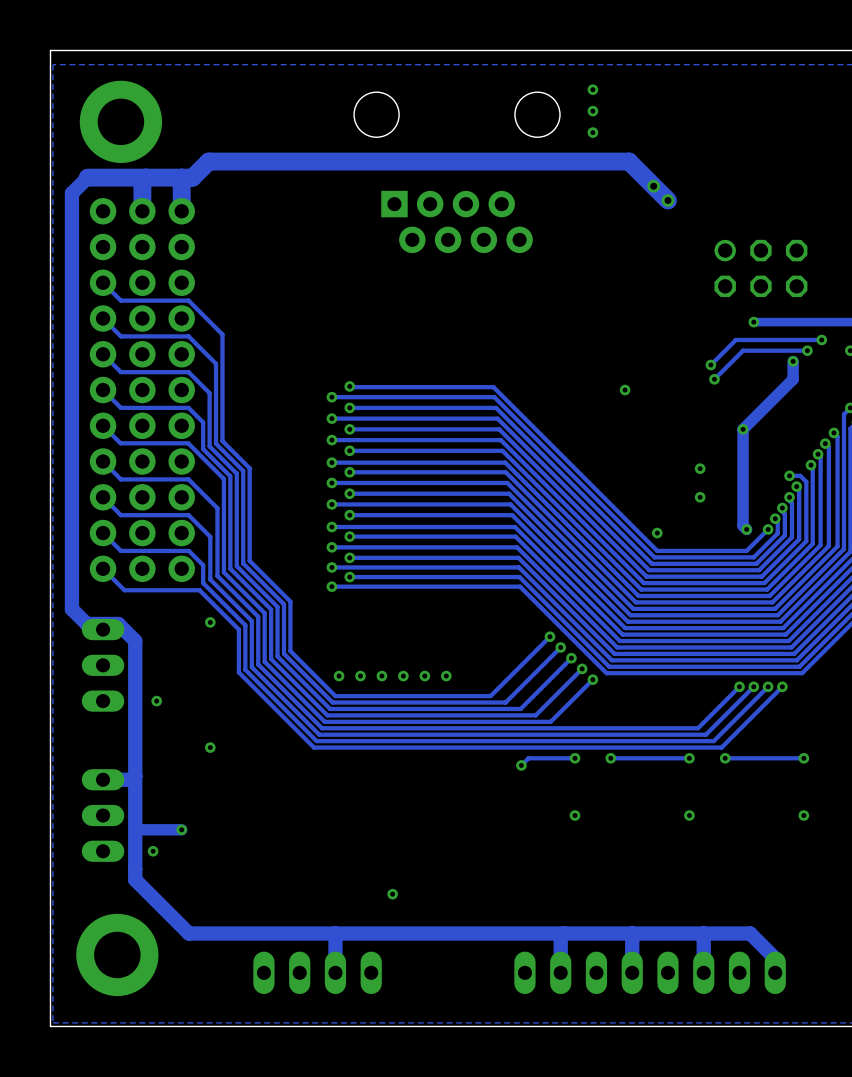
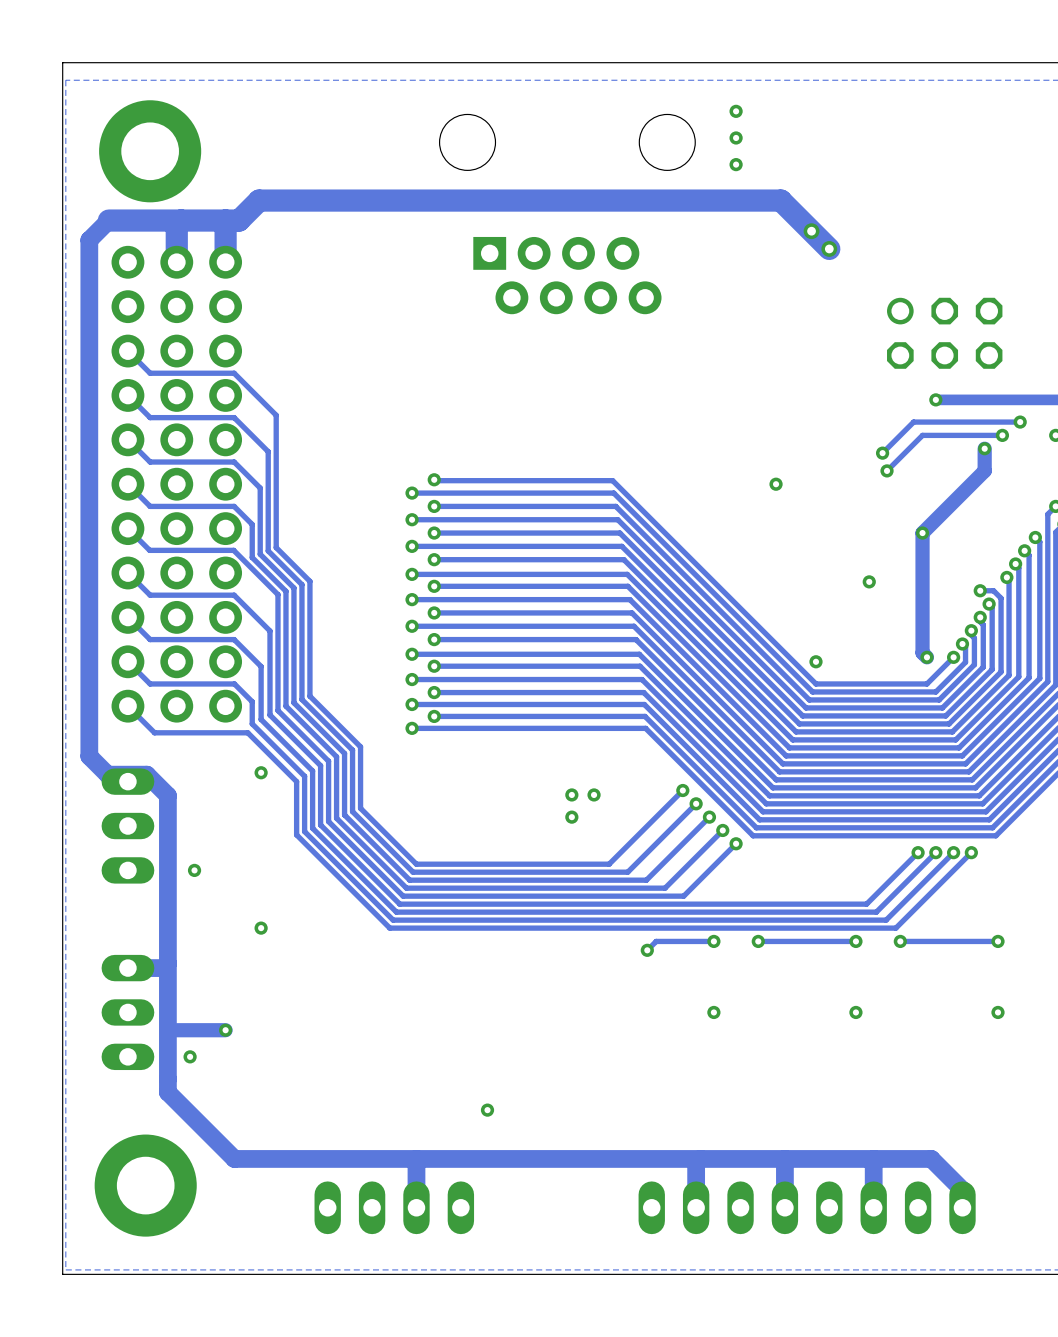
via: (700, 497) -> none
via: none -> (571, 794)
via: none -> (594, 794)
via: none -> (571, 817)
via: (339, 676) -> none
via: (360, 676) -> none
via: (381, 676) -> none
via: (403, 676) -> none
via: (424, 676) -> none
via: (446, 676) -> none

